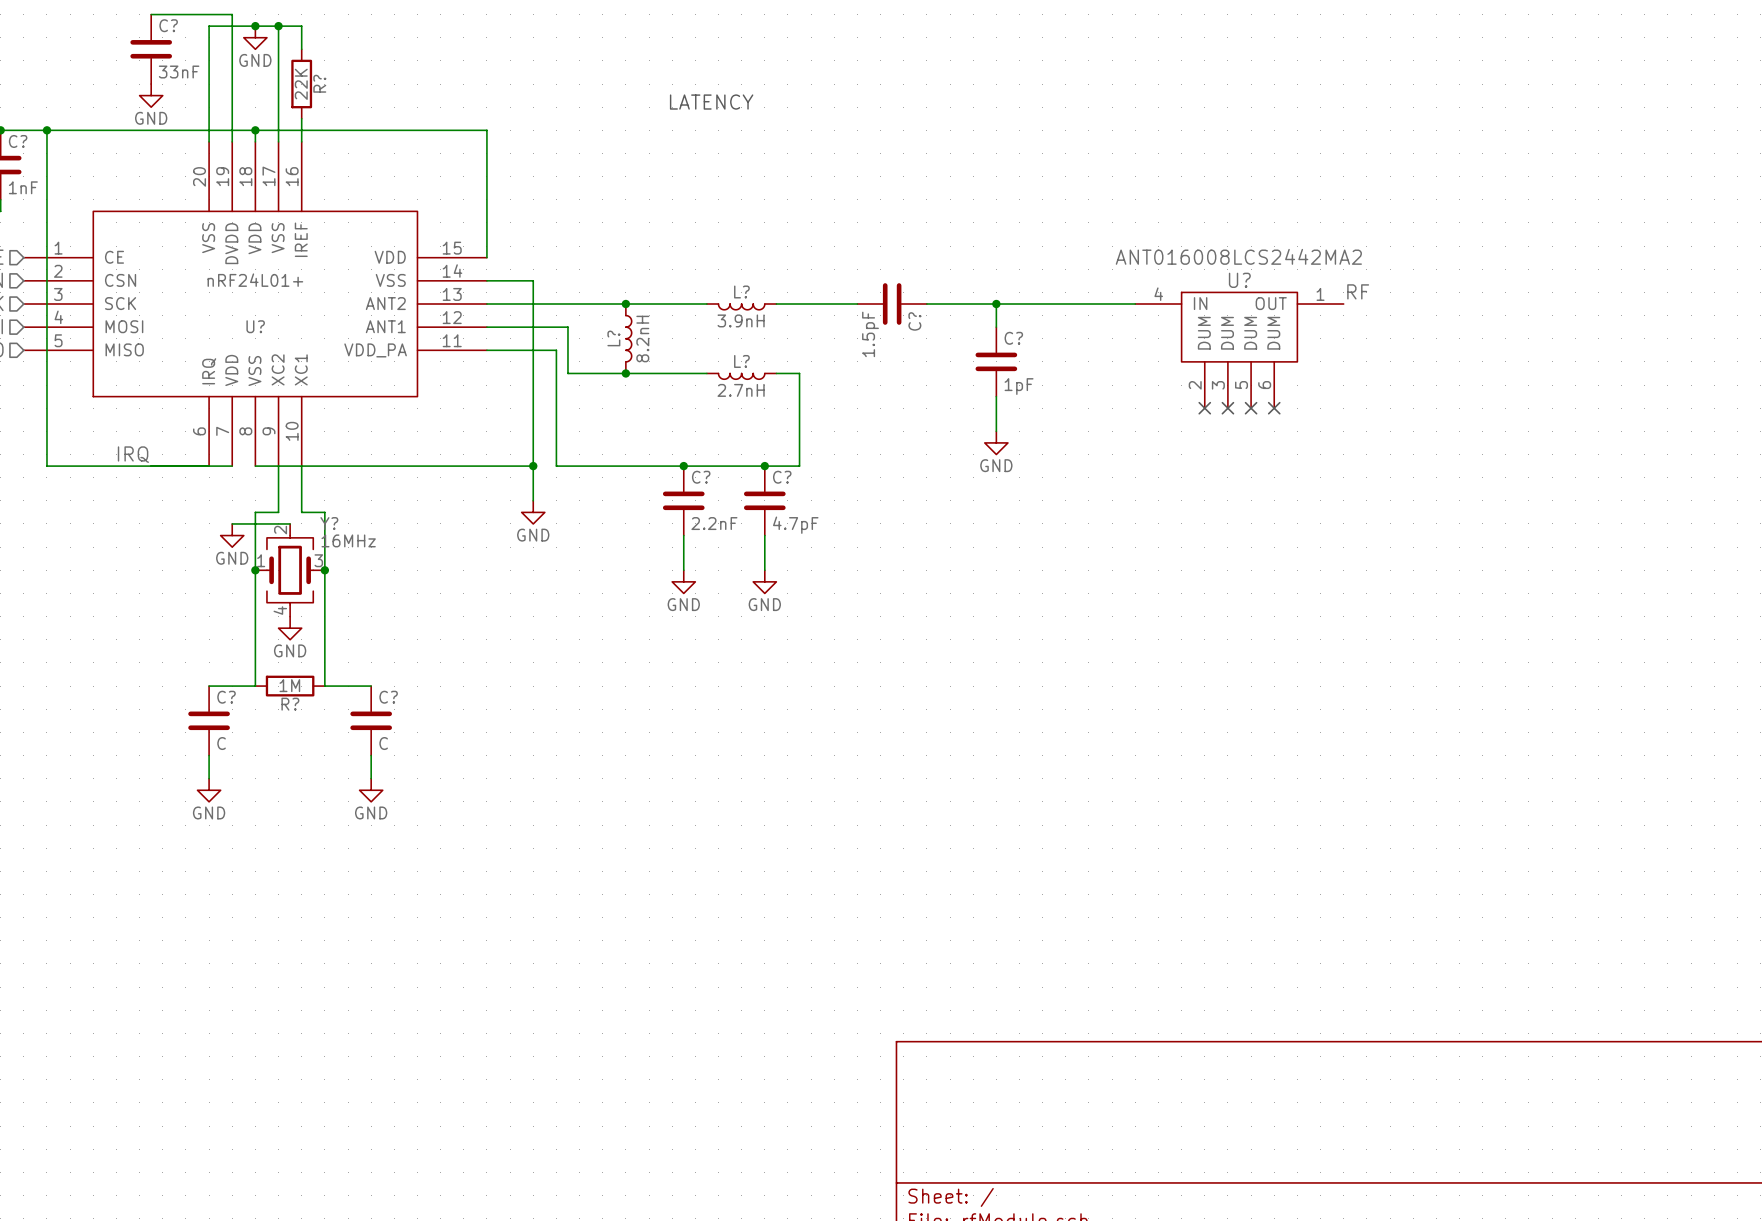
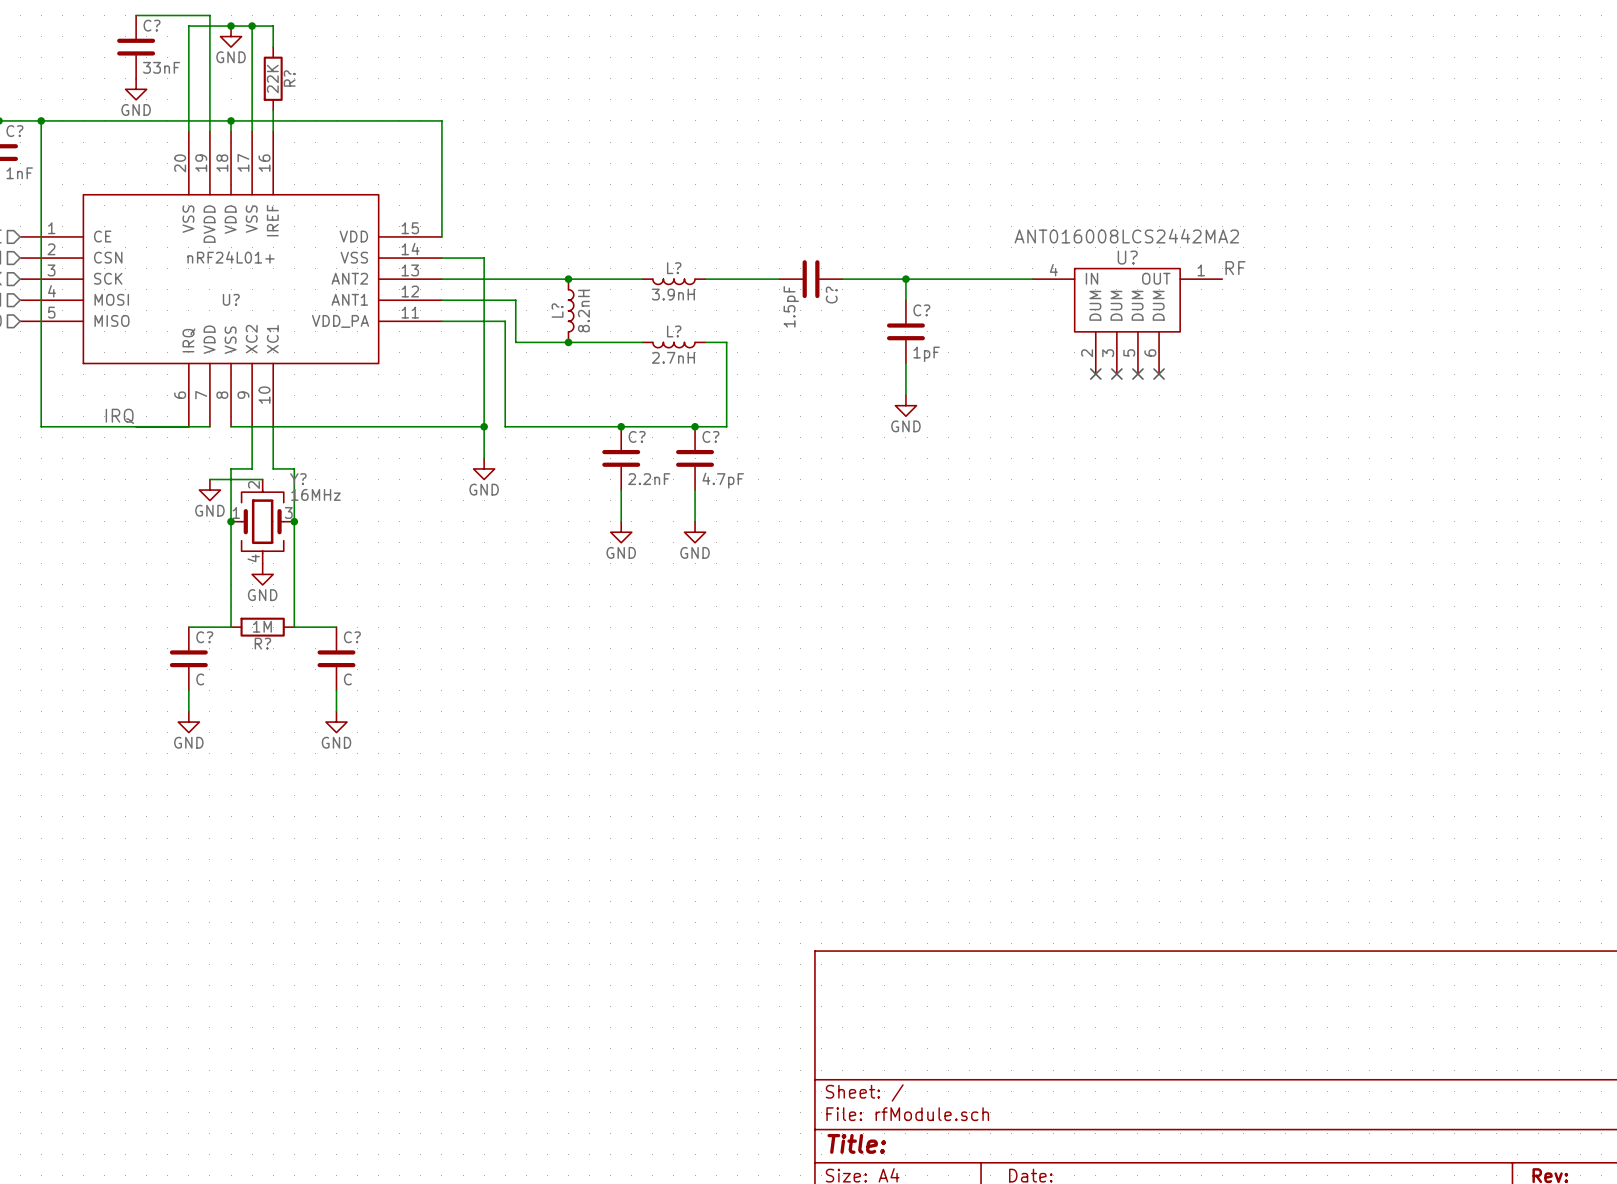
text: LATENCY (711, 102) -> none

